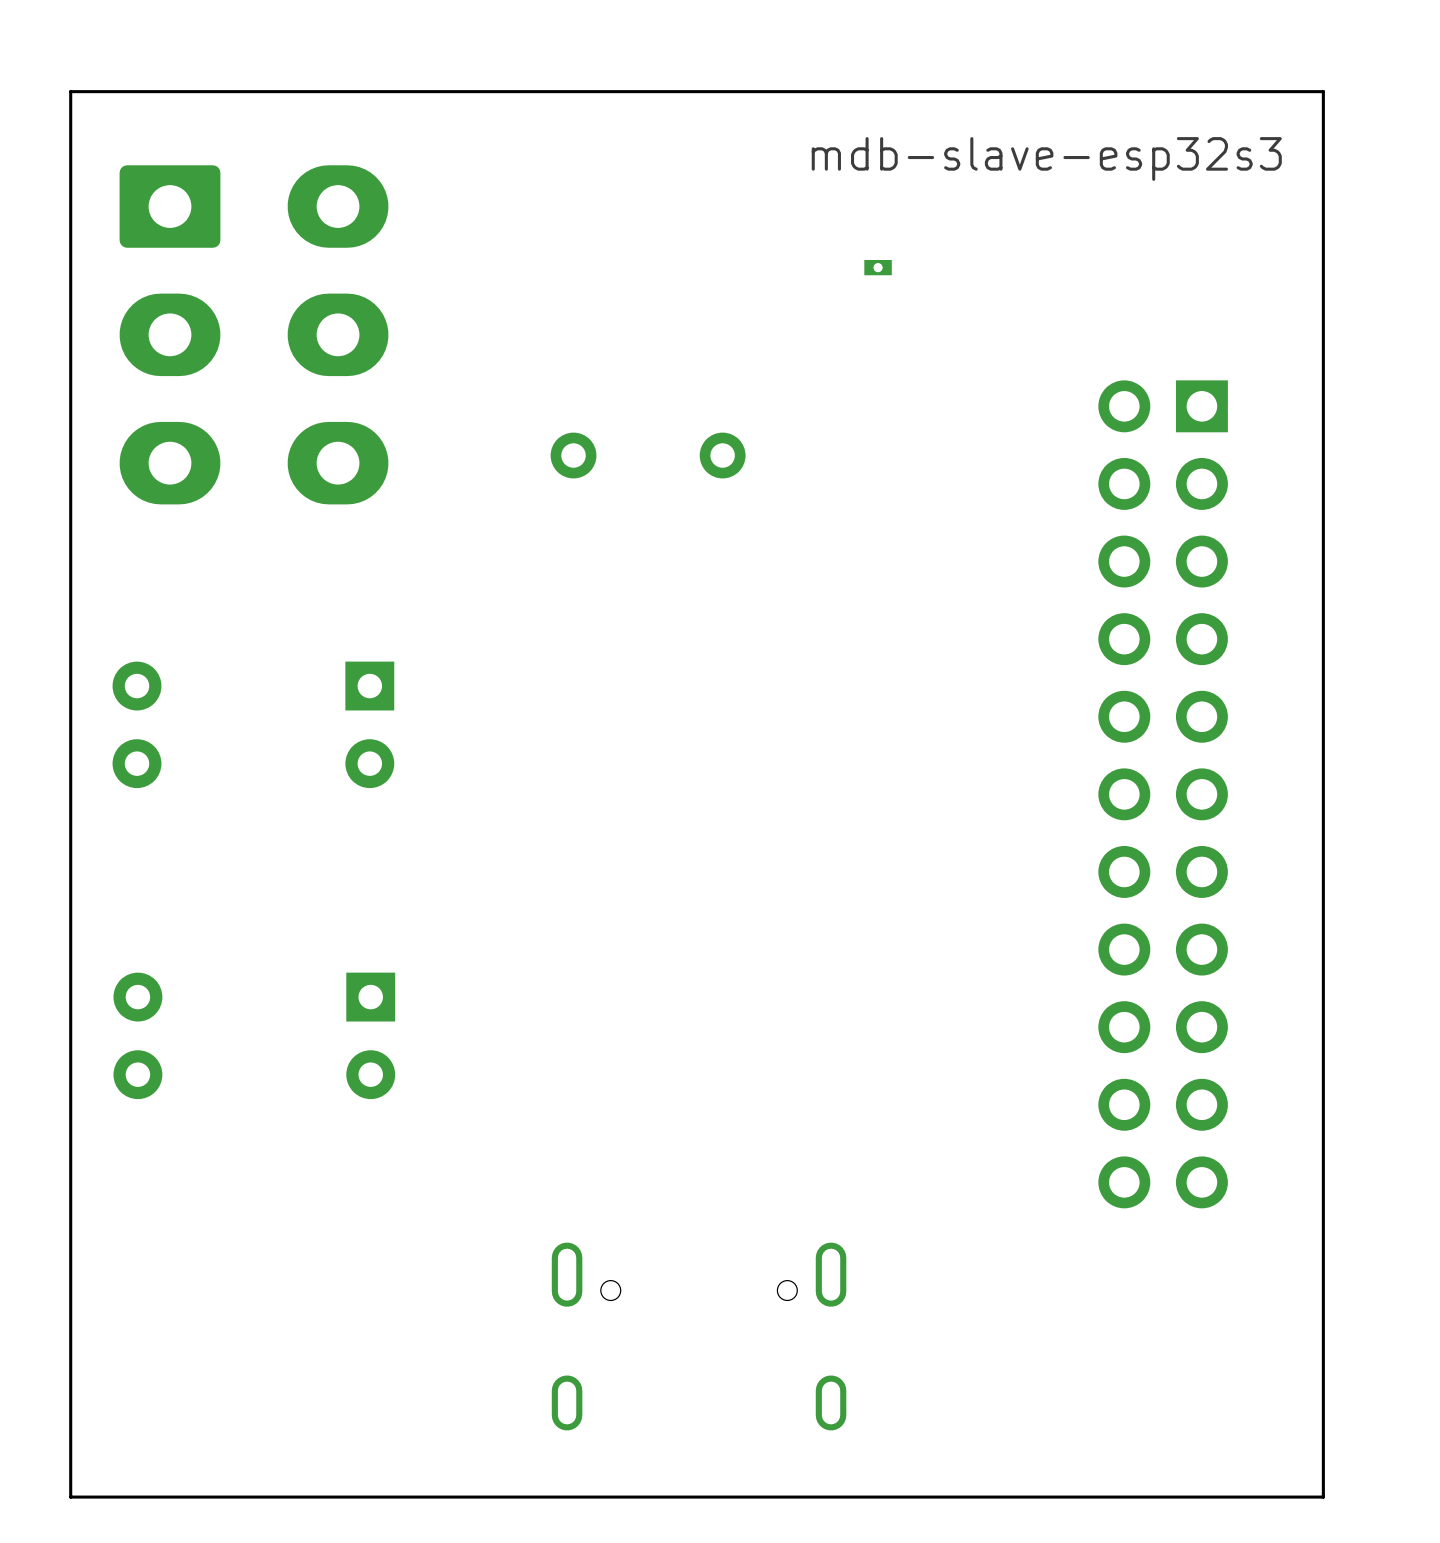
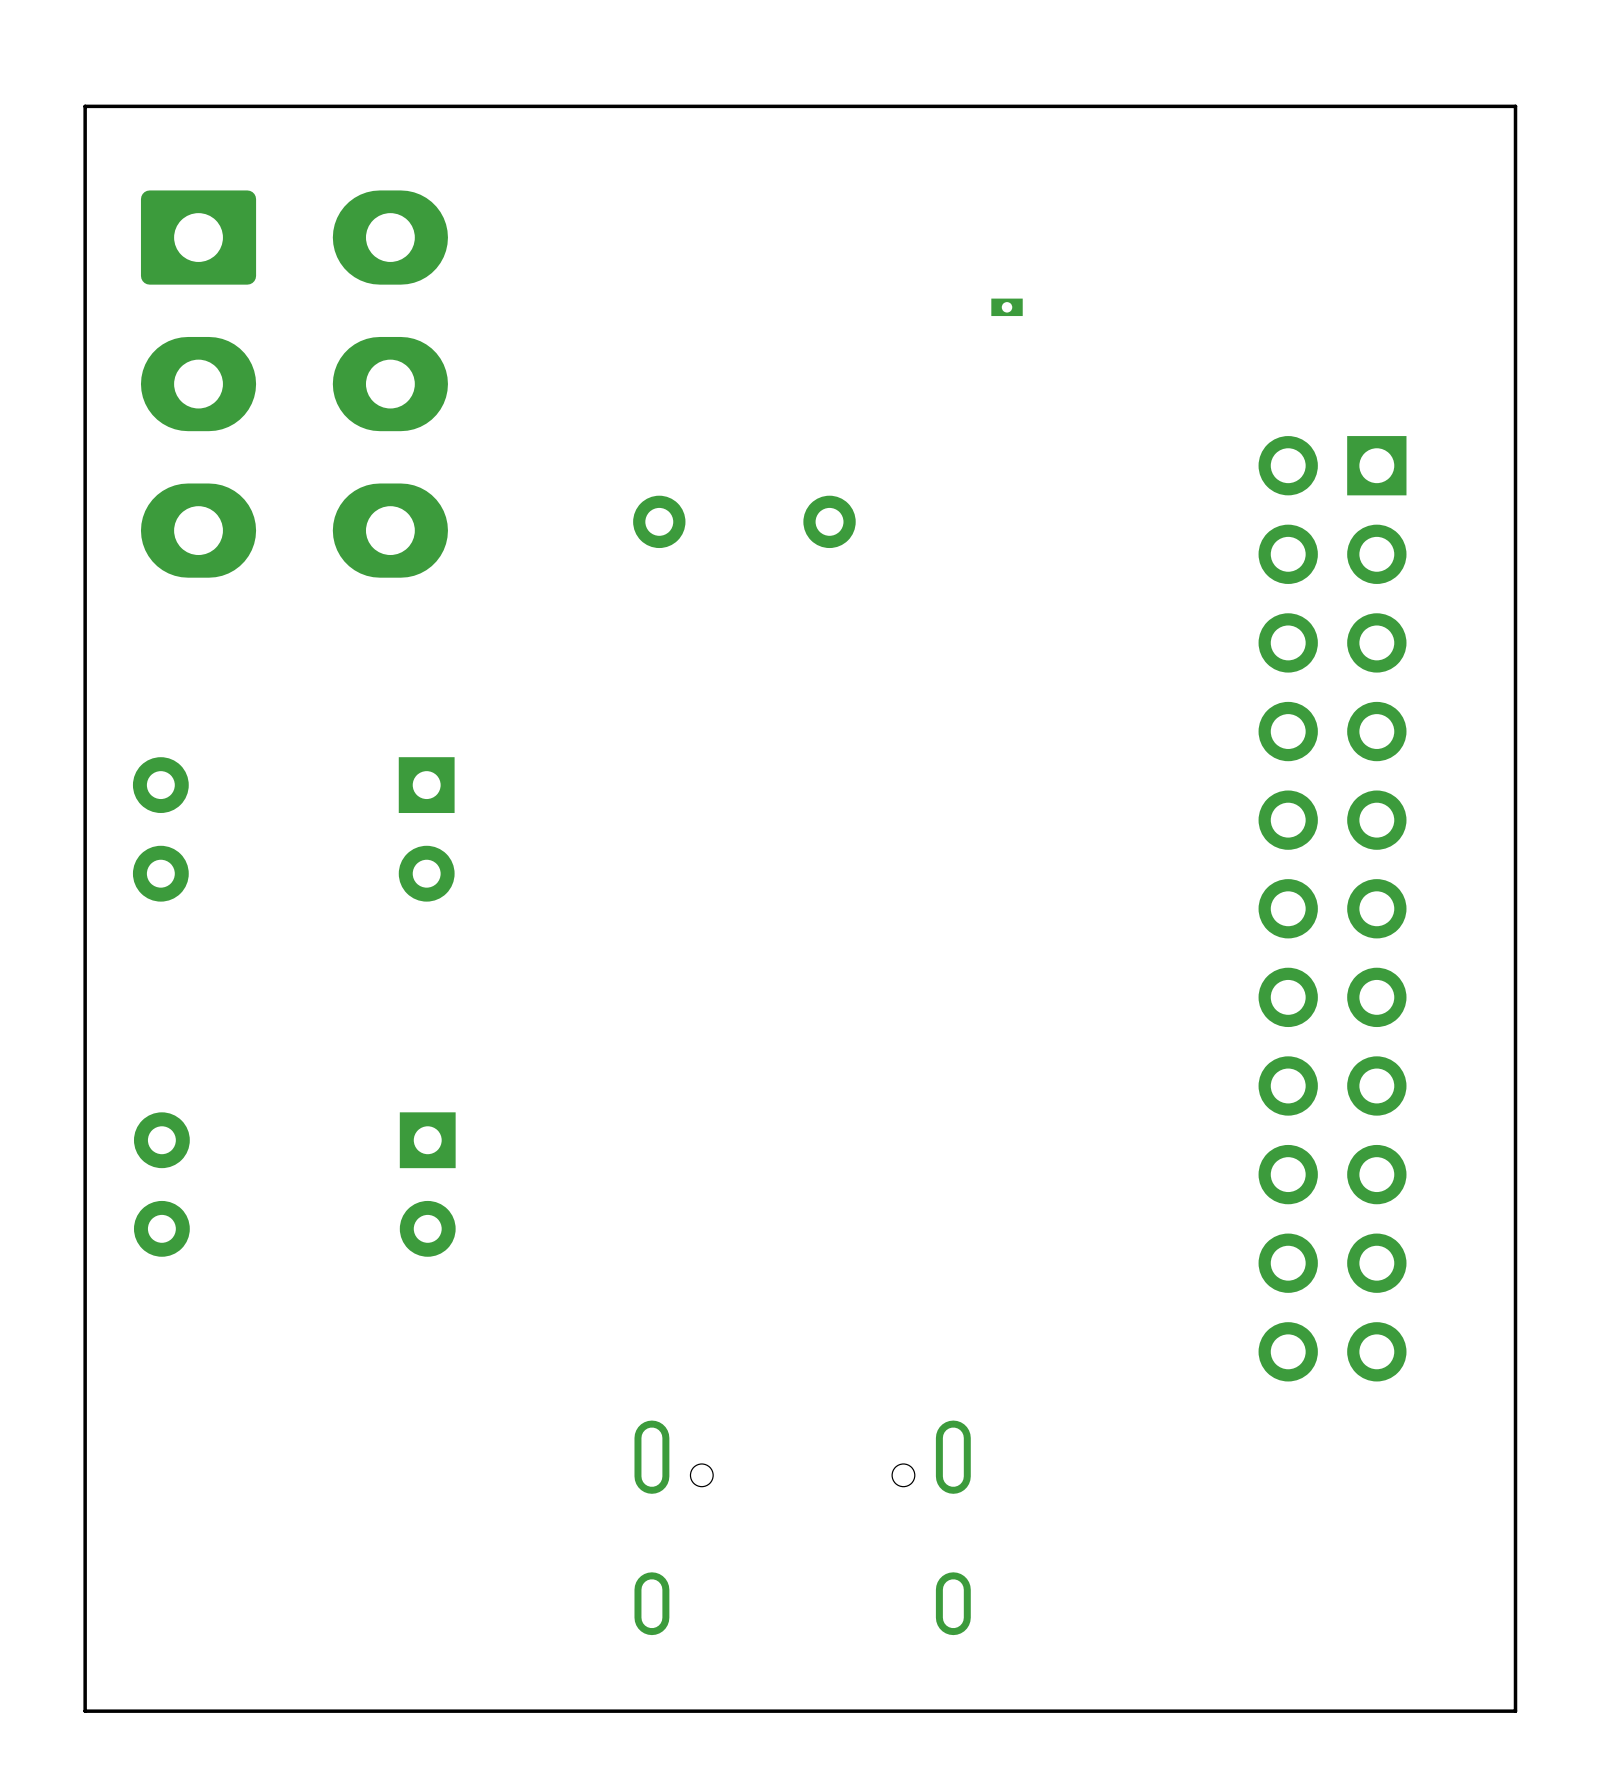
text: mdb-slave-esp32s3 (1046, 158) -> none

